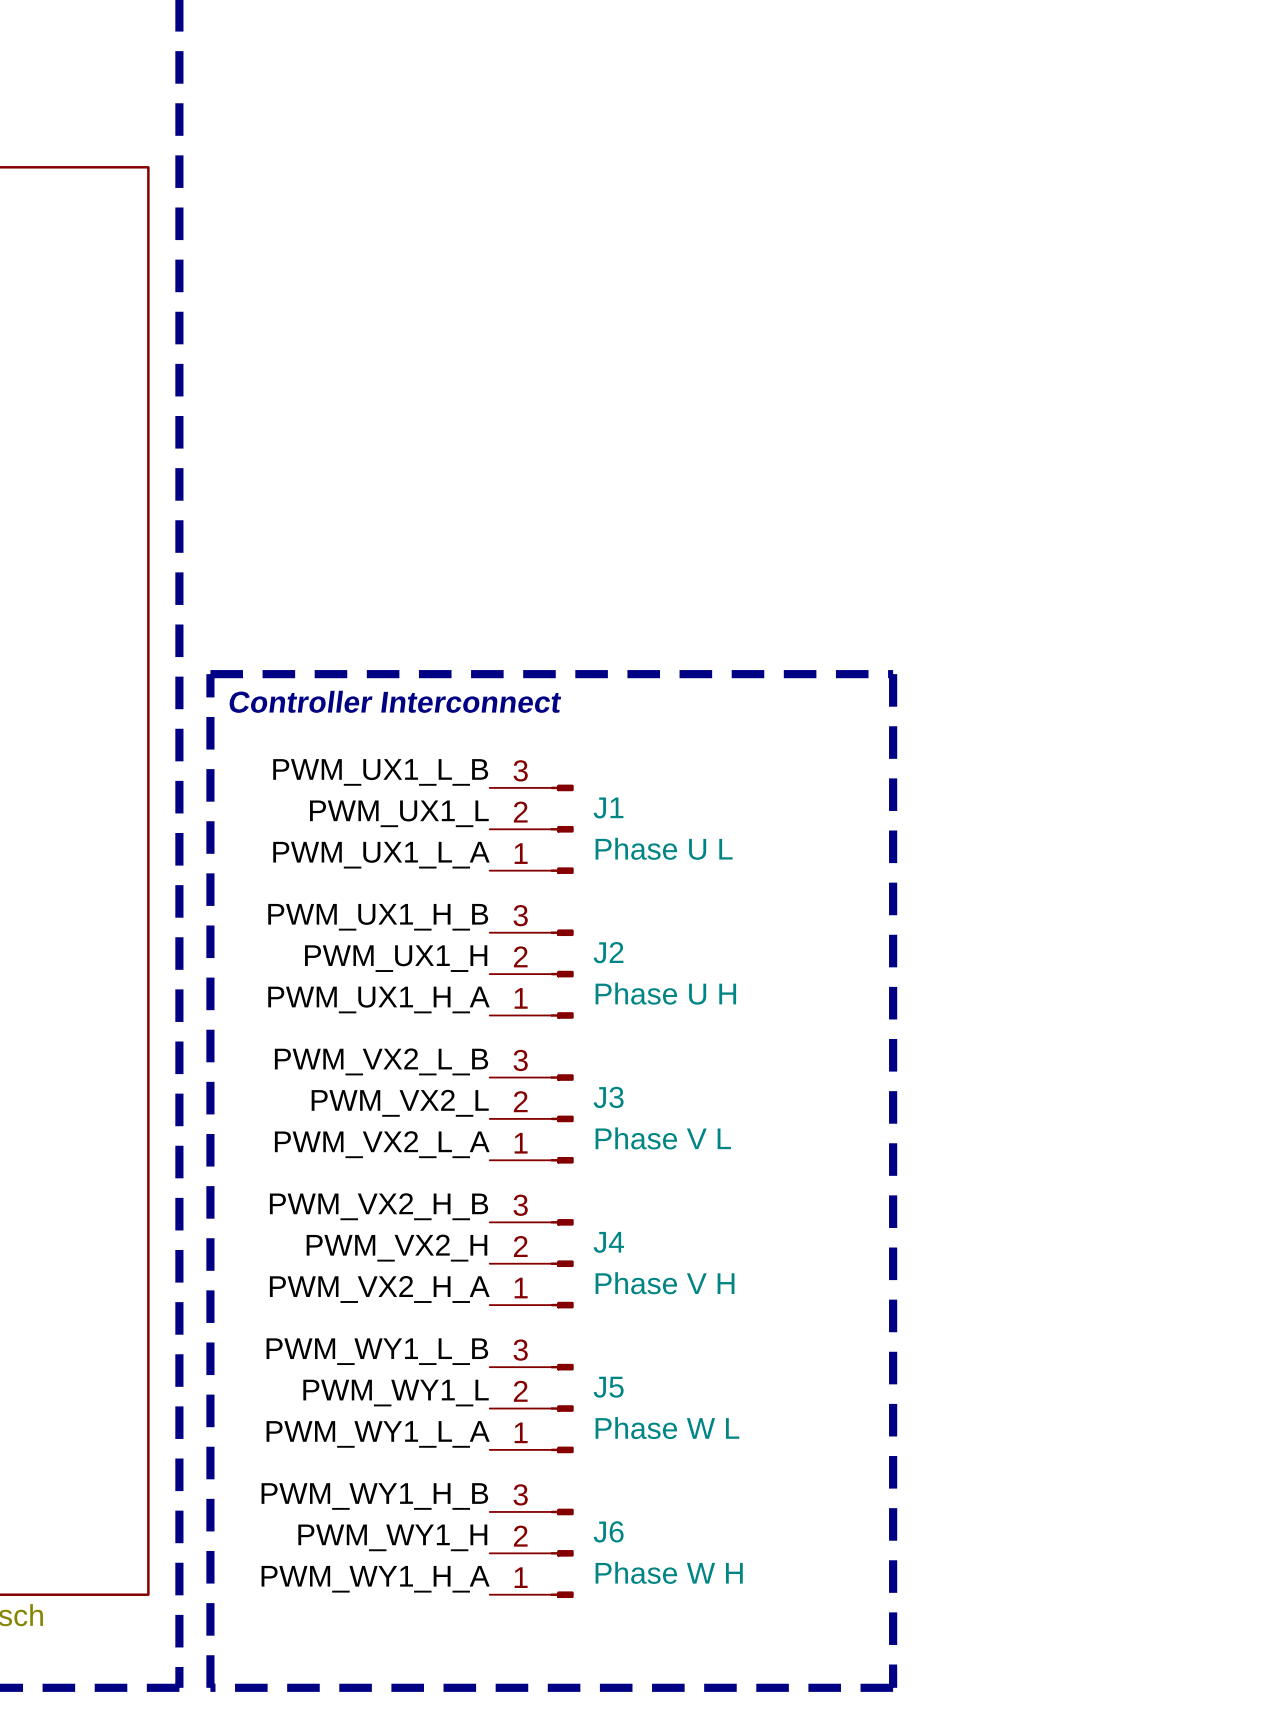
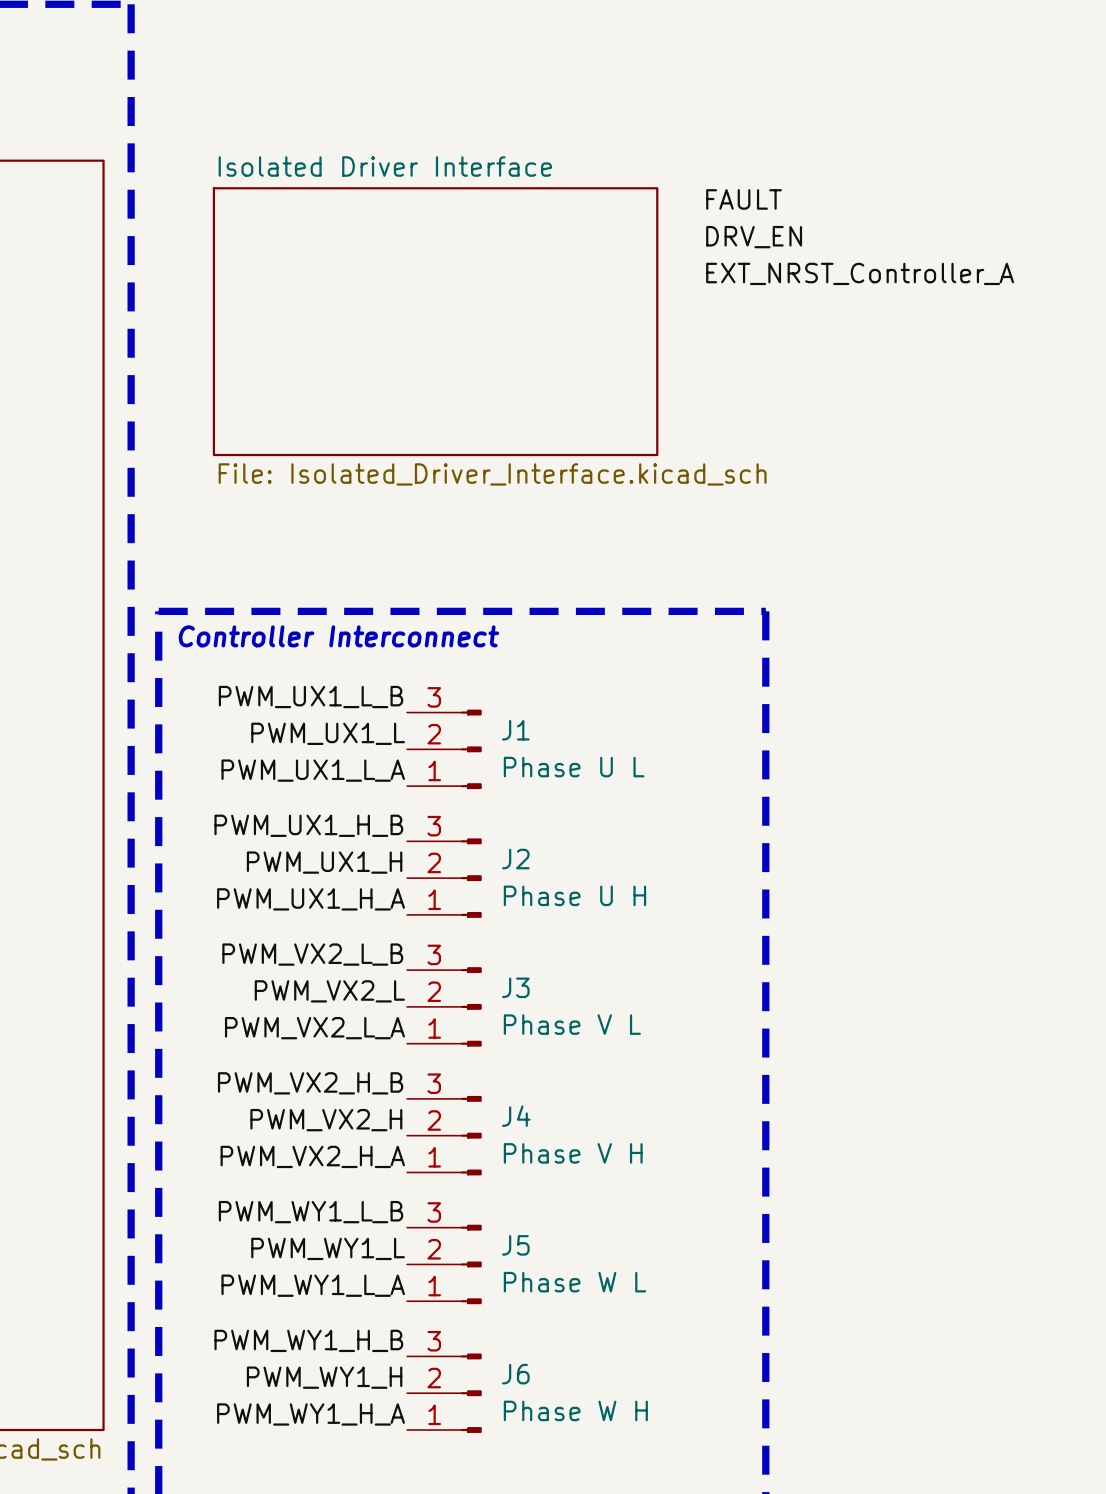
label: none -> FAULT (744, 199)
label: none -> DRV_EN (754, 237)
label: none -> EXT_NRST_Controller_A (860, 273)
sheet Isolated Driver Interface: none -> File: Isolated_Driver_Interface.kicad_sch (435, 321)

